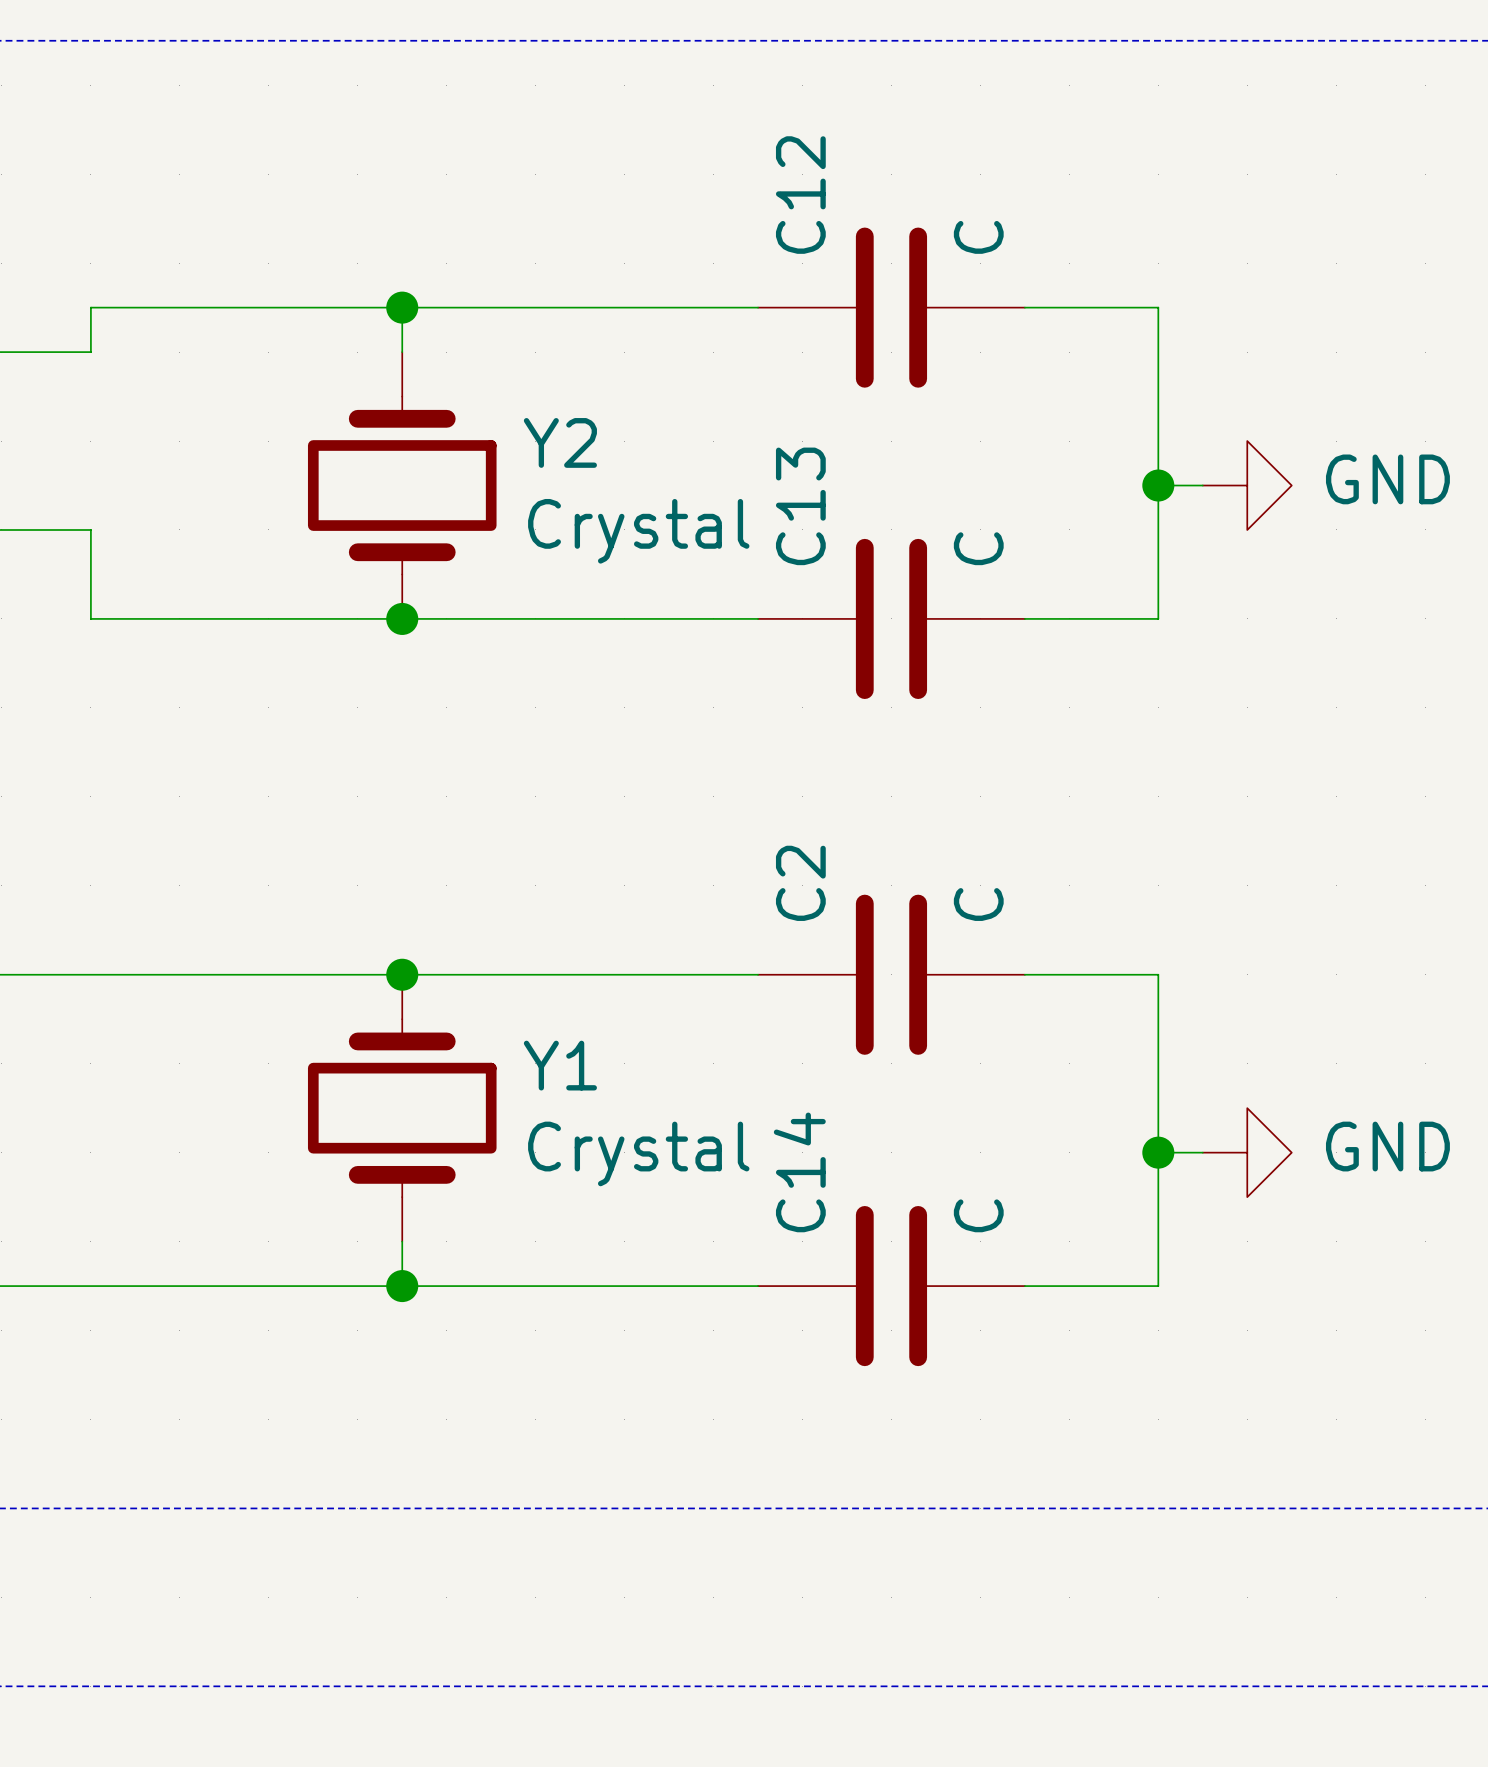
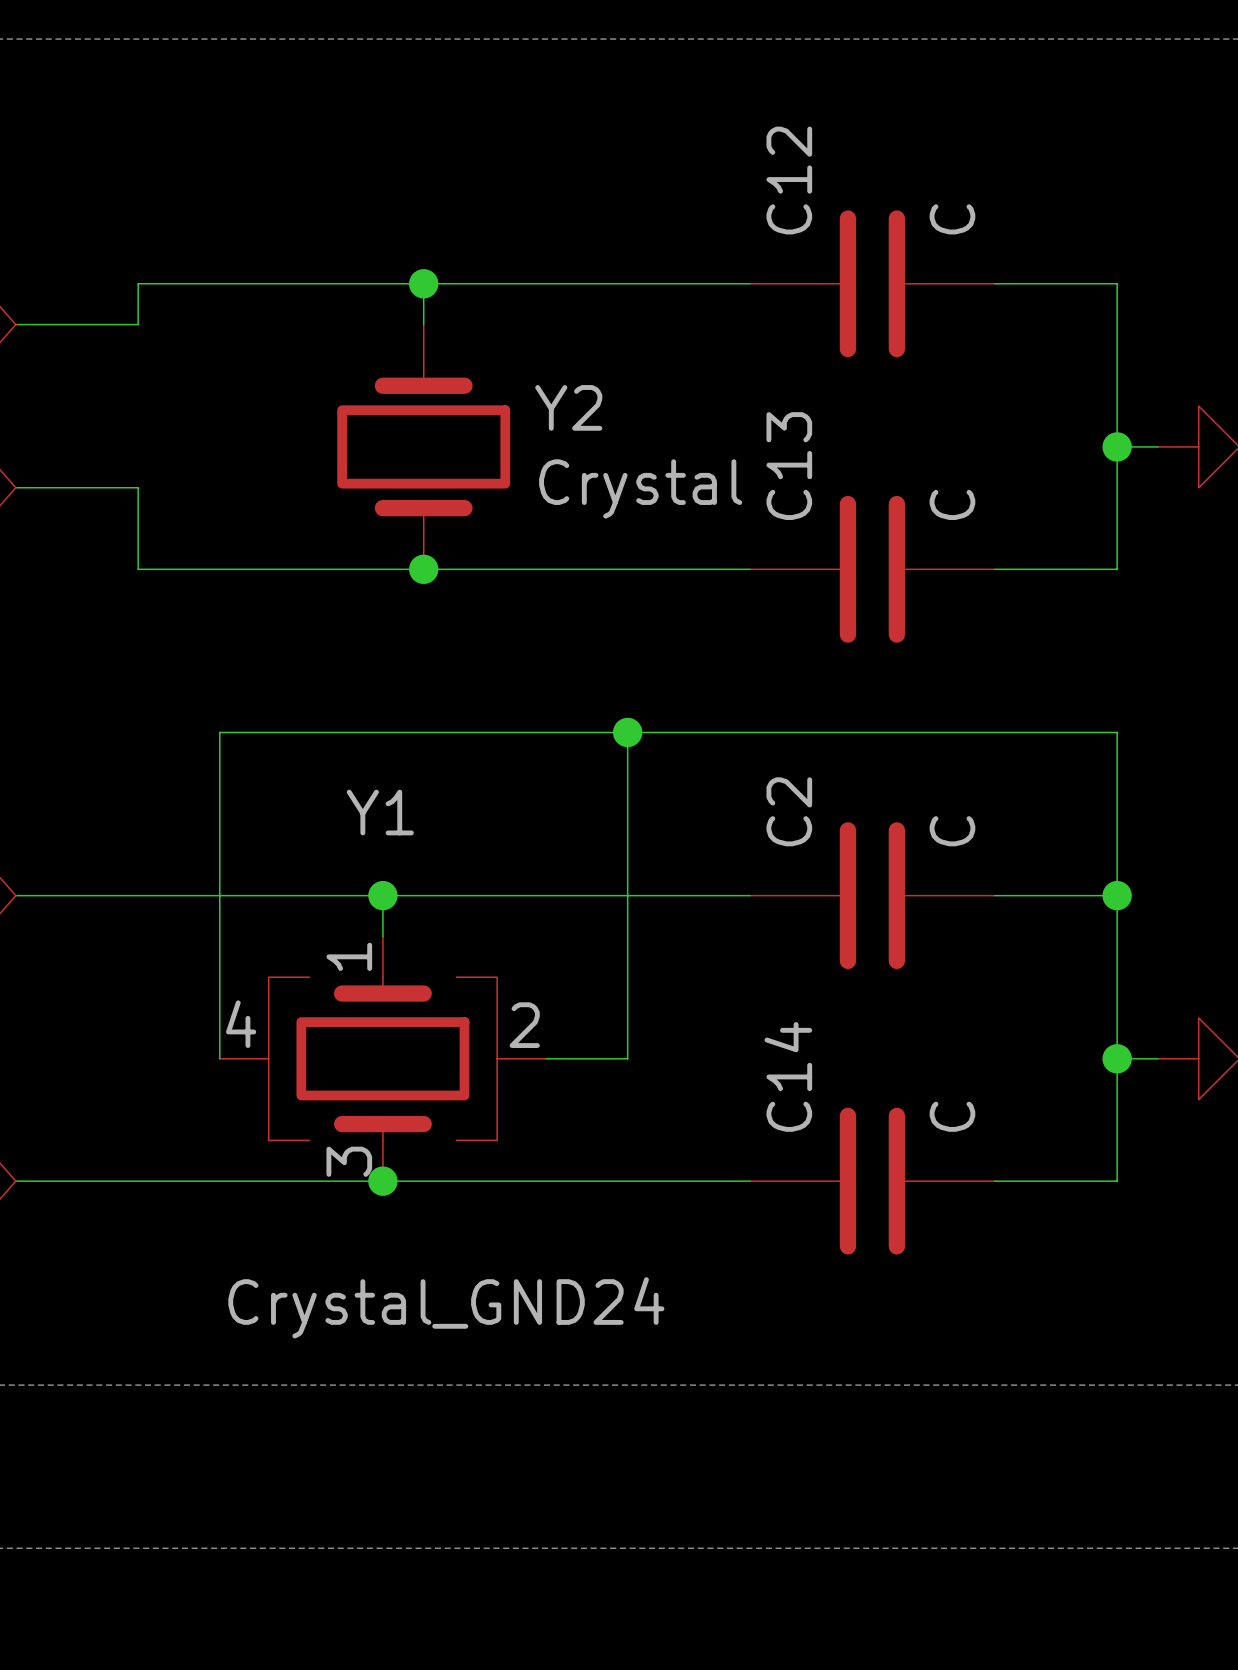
wire: none -> (627, 732) (627, 1058) (546, 1058)
junction: none -> (627, 732)
Y1 symbol: [307, 974, 497, 1242] -> [219, 936, 547, 1182]
junction position: (402, 974) -> (382, 895)
wire: none -> (1117, 895) (1117, 732) (219, 732) (219, 1058)
junction: none -> (1117, 895)
Y1 name position: Y1 (560, 1065) -> Y1 (380, 812)
Y1 value: Crystal (638, 1153) -> Crystal_GND24 (446, 1307)
wire: (402, 1241) (402, 1286) -> (382, 895) (382, 936)
junction position: (402, 1286) -> (382, 1181)

